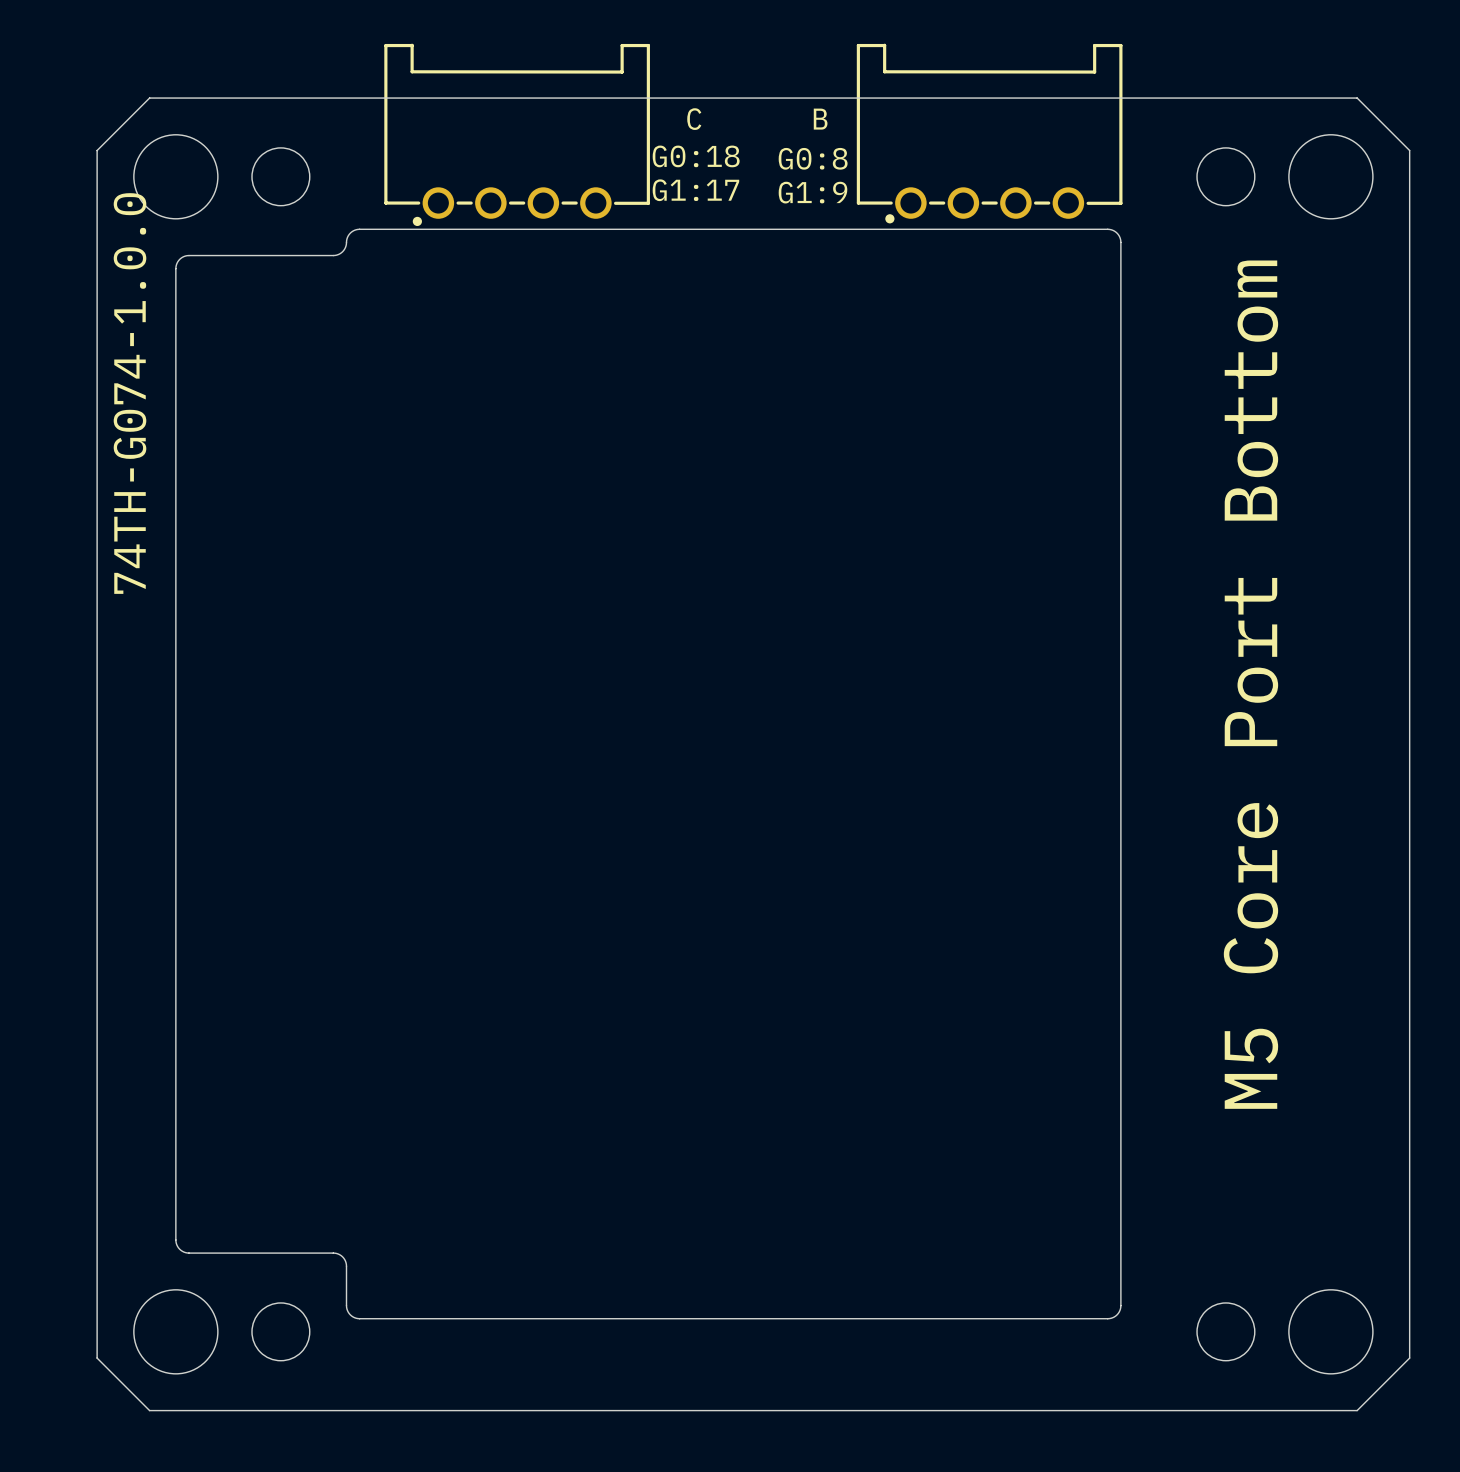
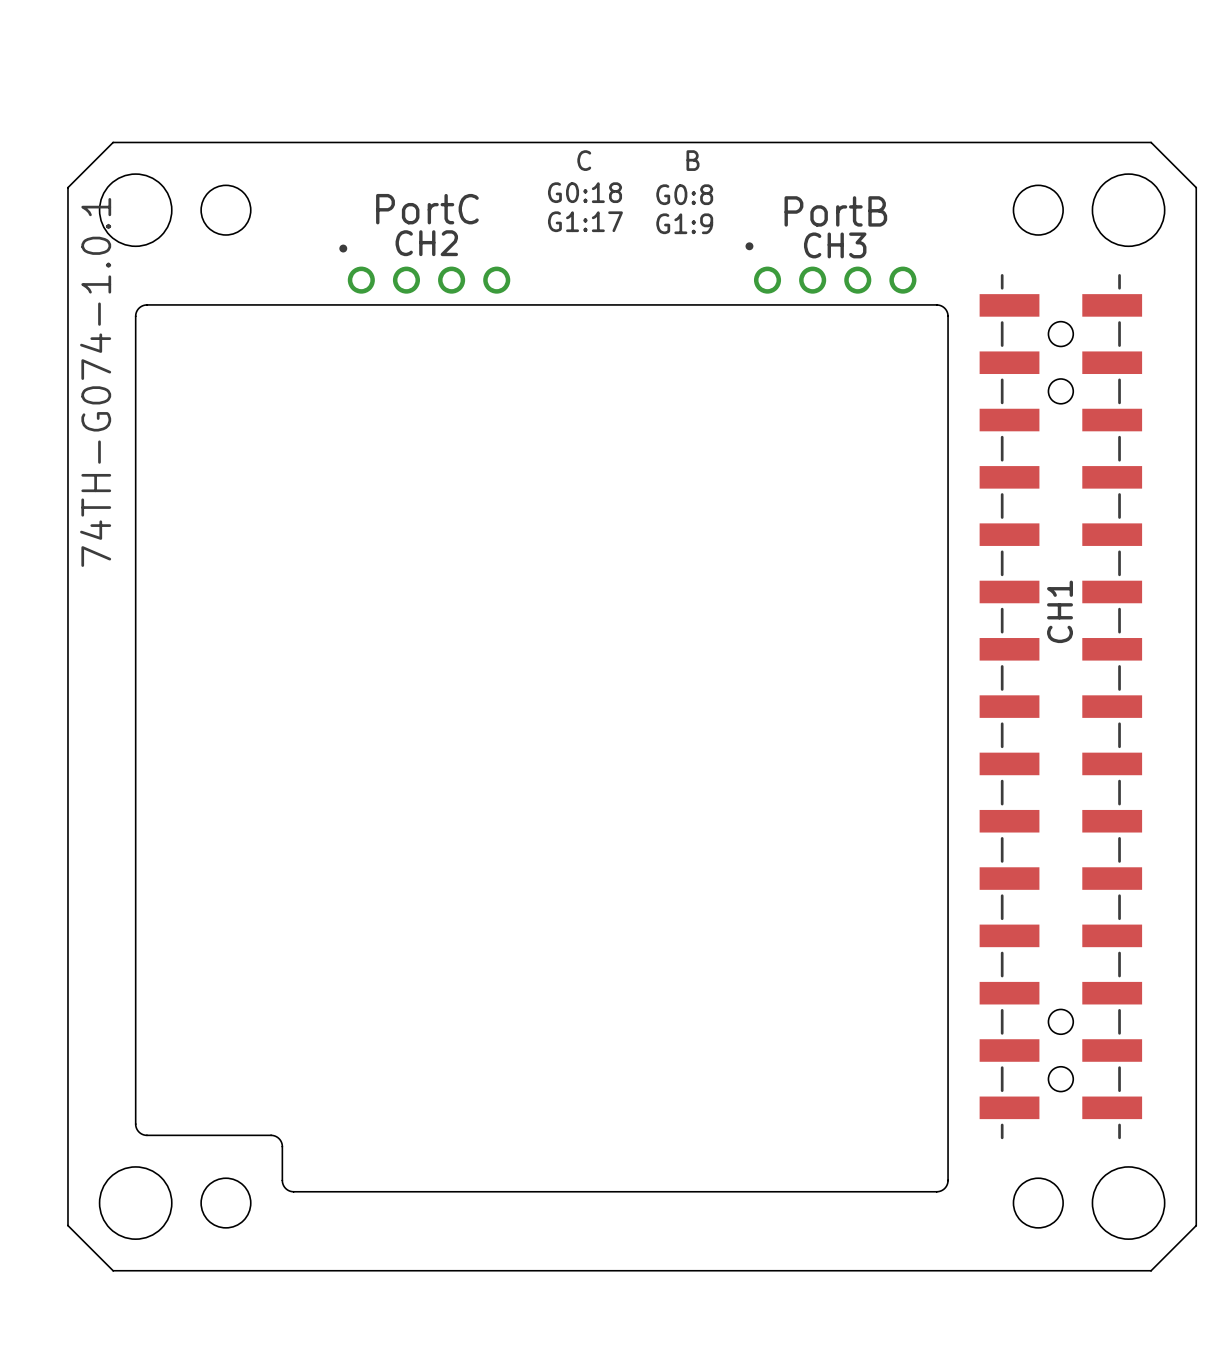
CH2 side: top (517, 131) -> bottom (429, 280)
CH3 side: top (989, 131) -> bottom (835, 280)
board edge: (175, 300) (175, 266) (178, 260) (183, 256) (335, 255) (343, 250) (350, 233) (359, 229) (1109, 229) (1117, 233) (1120, 240) (1120, 300) -> (135, 316) (138, 308) (146, 304) (936, 304) (944, 308) (948, 316)
text: 74TH-G074-1.0.0 (130, 393) -> 74TH-G074-1.0.1 (95, 382)
text: M5 Core Port Bottom (1250, 684) -> none
CH1: none -> (1060, 706)

